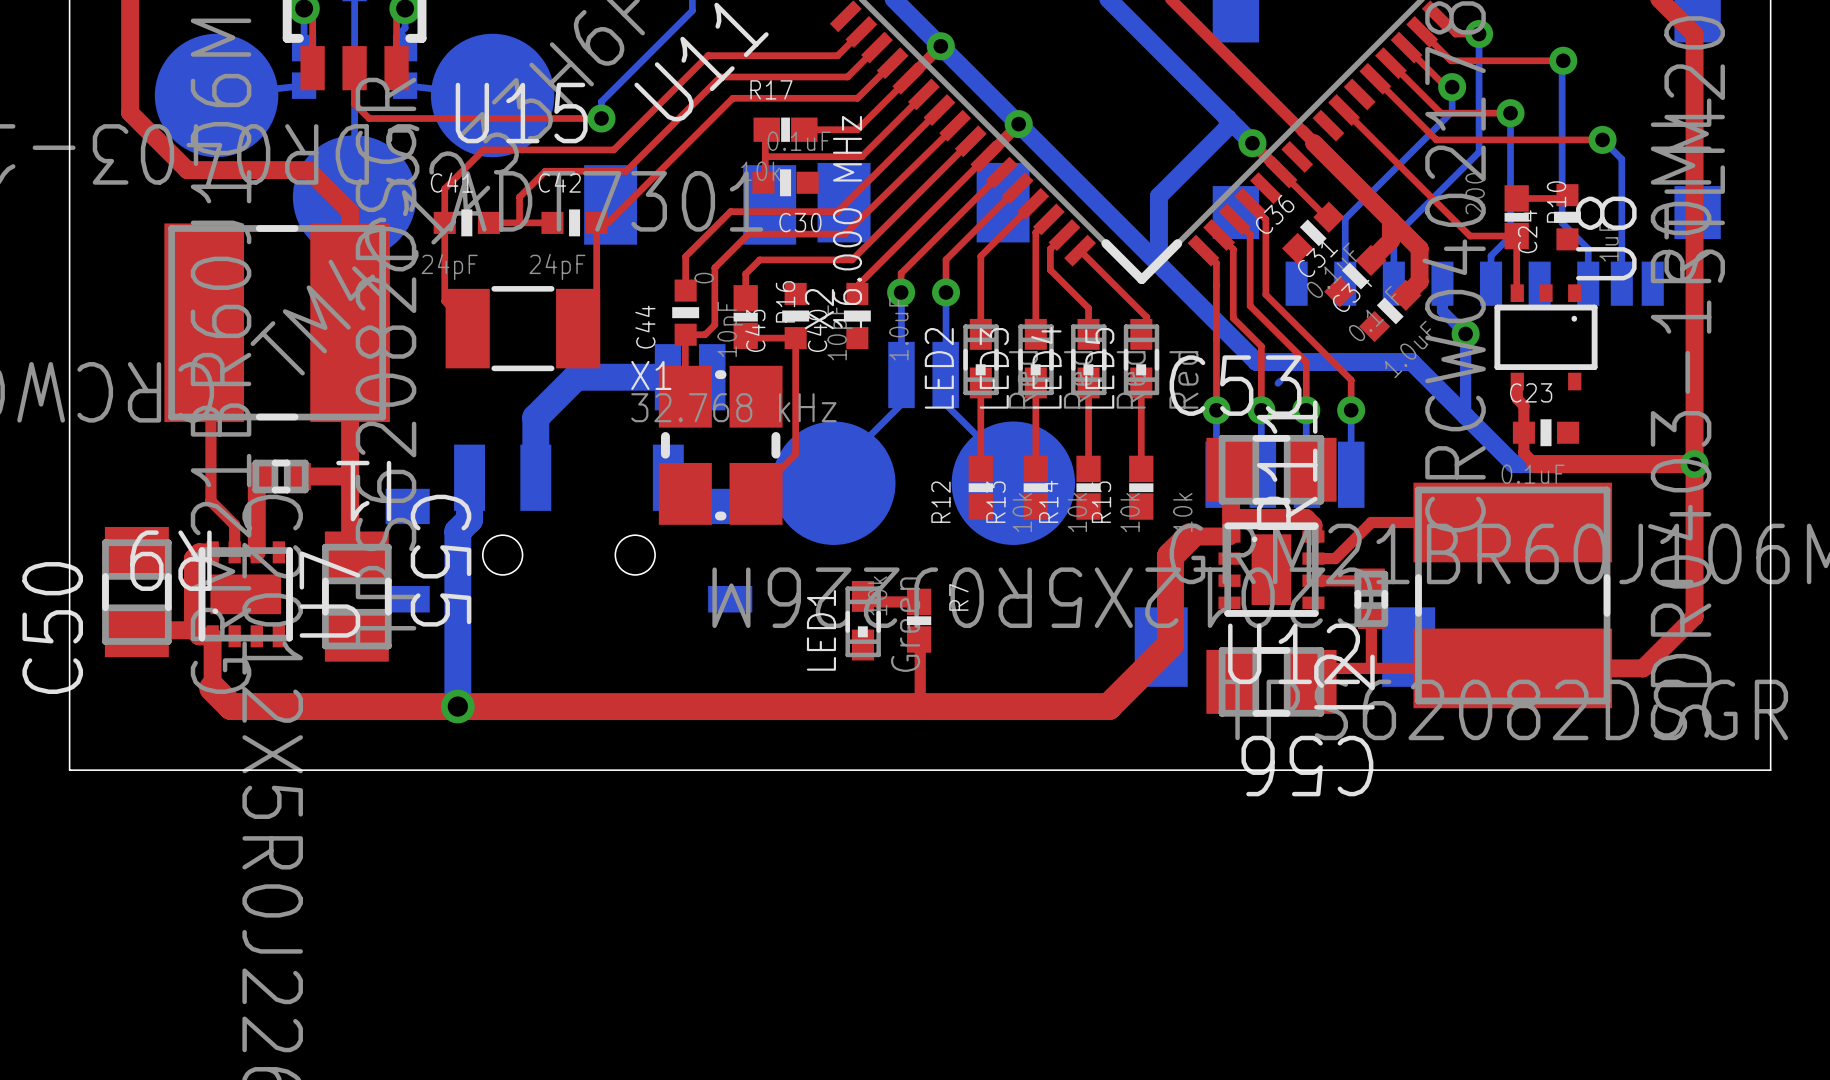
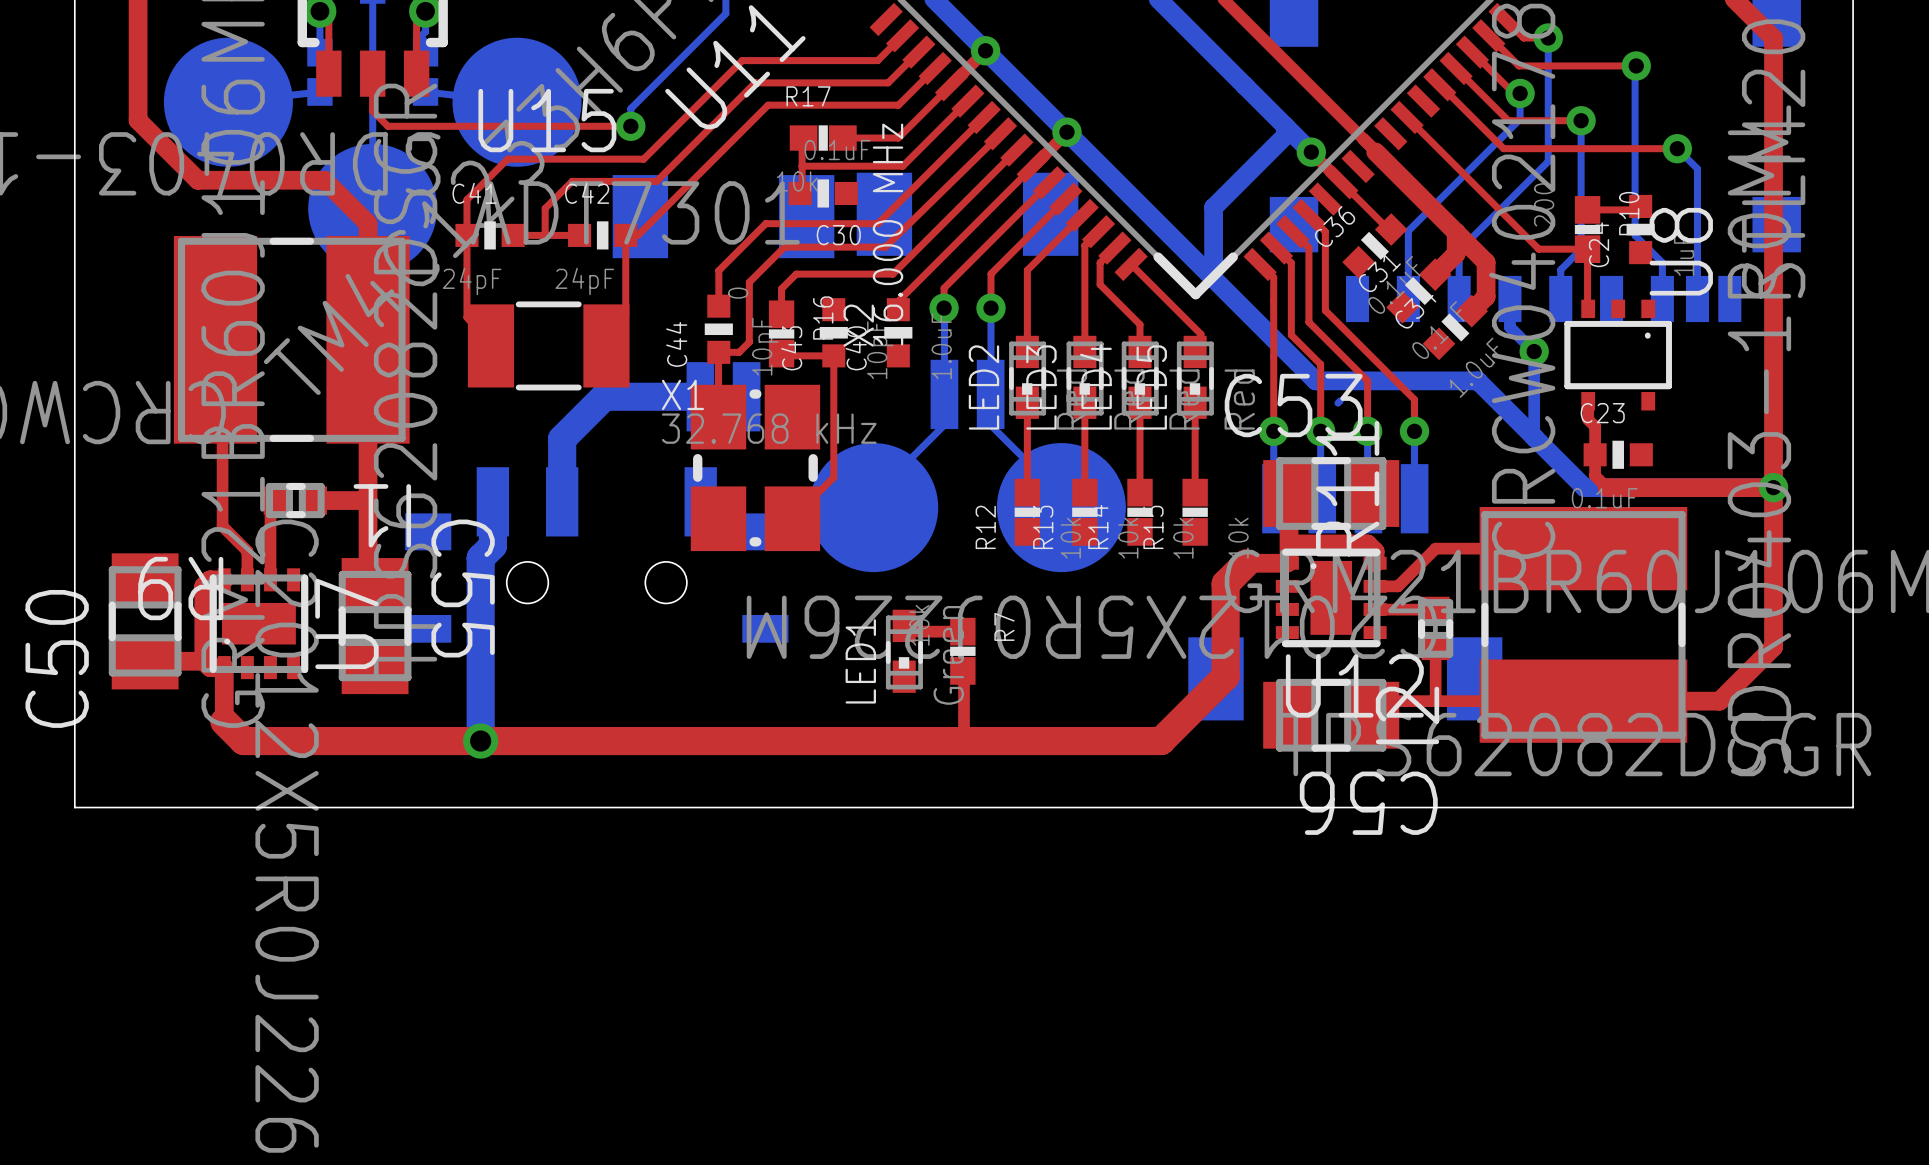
top track width: thick (256, 482) (256, 552) -> thin (270, 506) (270, 579)

